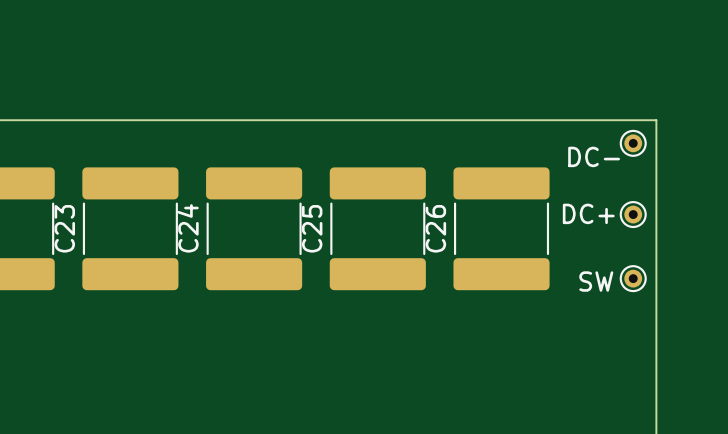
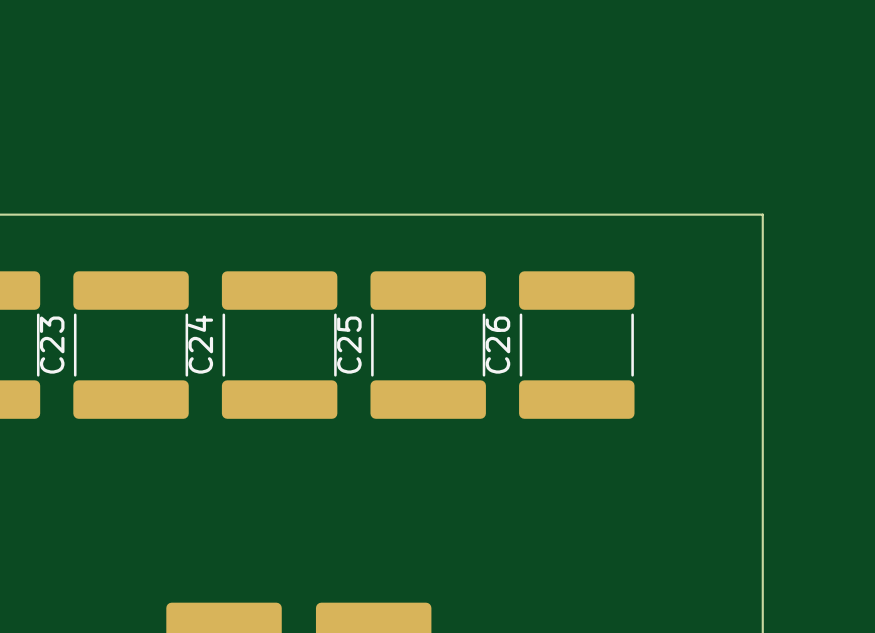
DC-: (633, 143) -> none
DC+: (633, 214) -> none
SW: (633, 278) -> none

